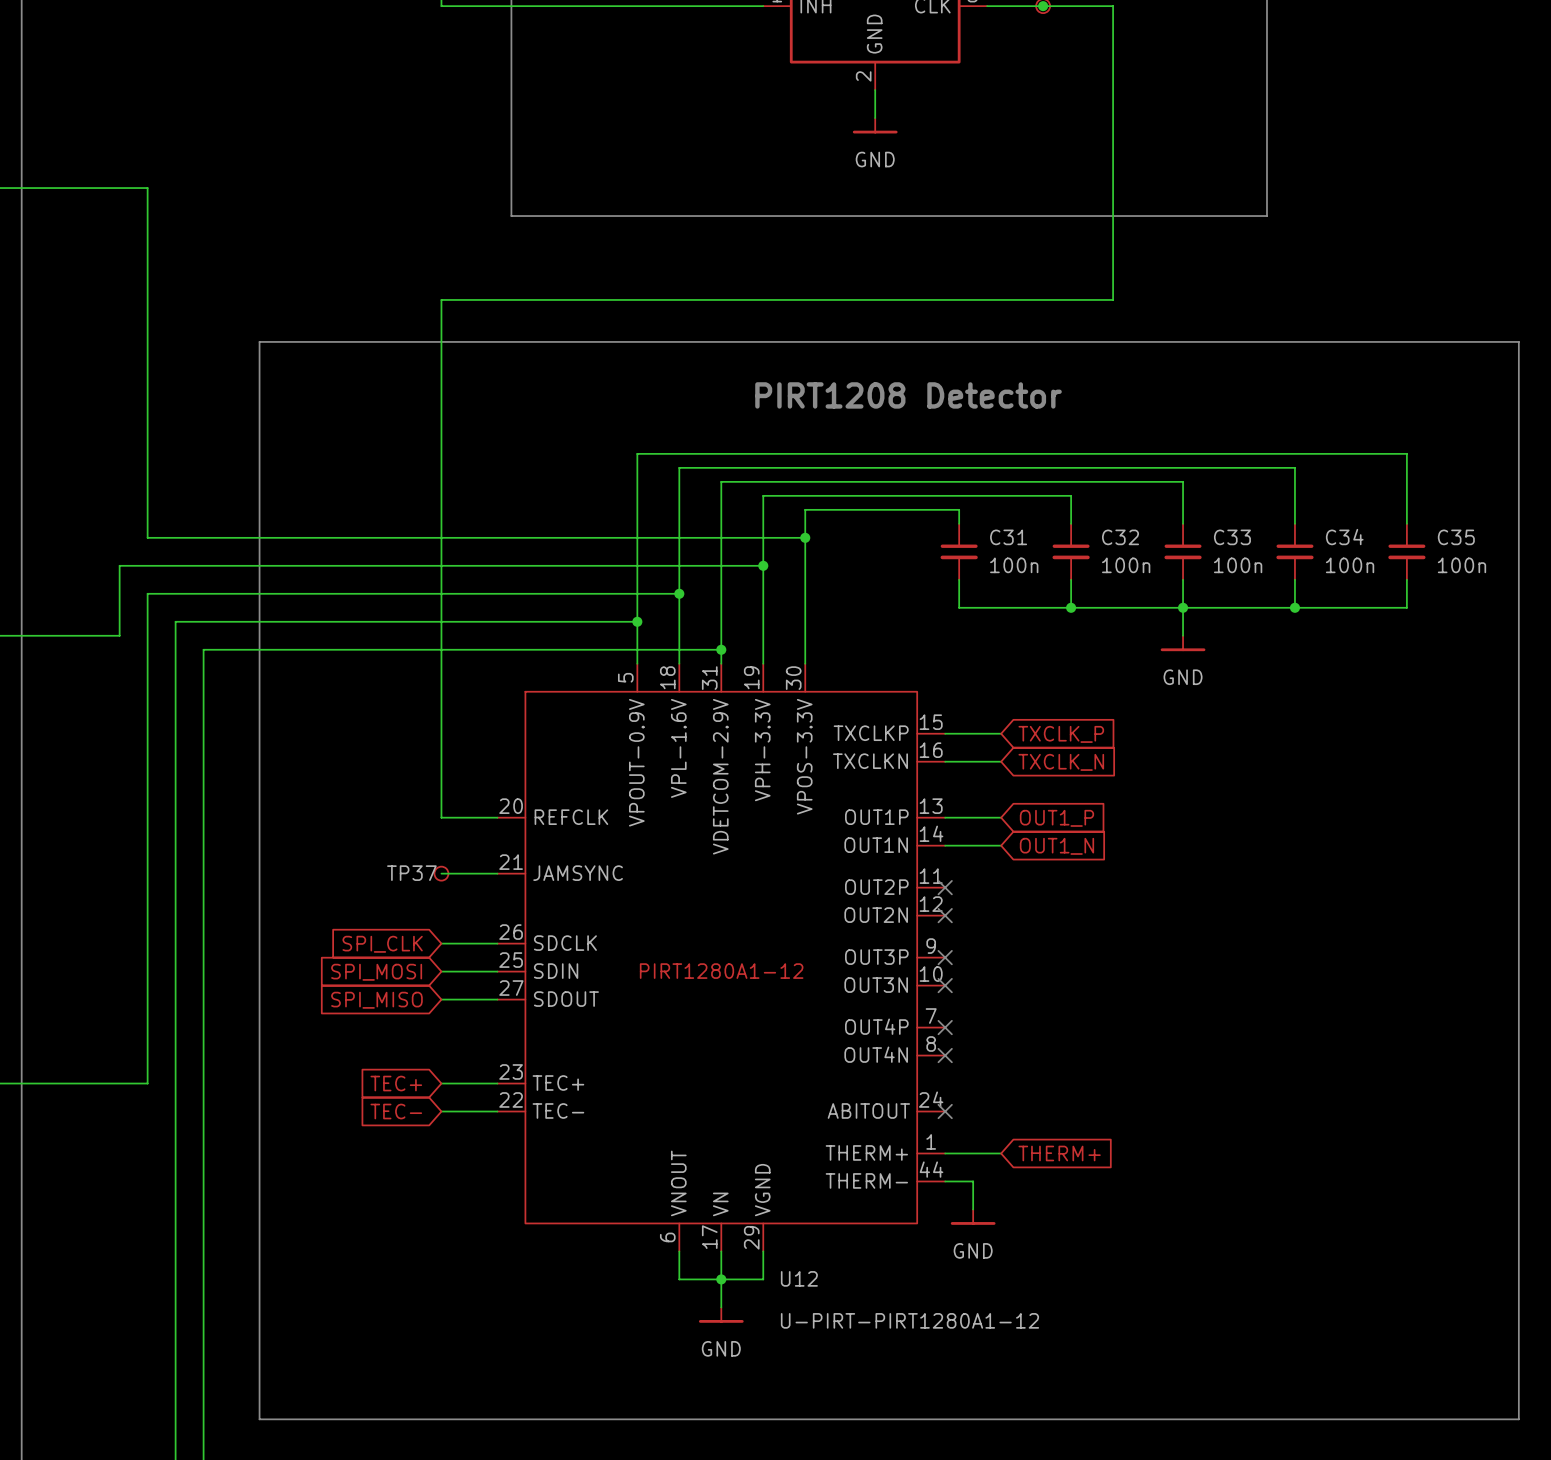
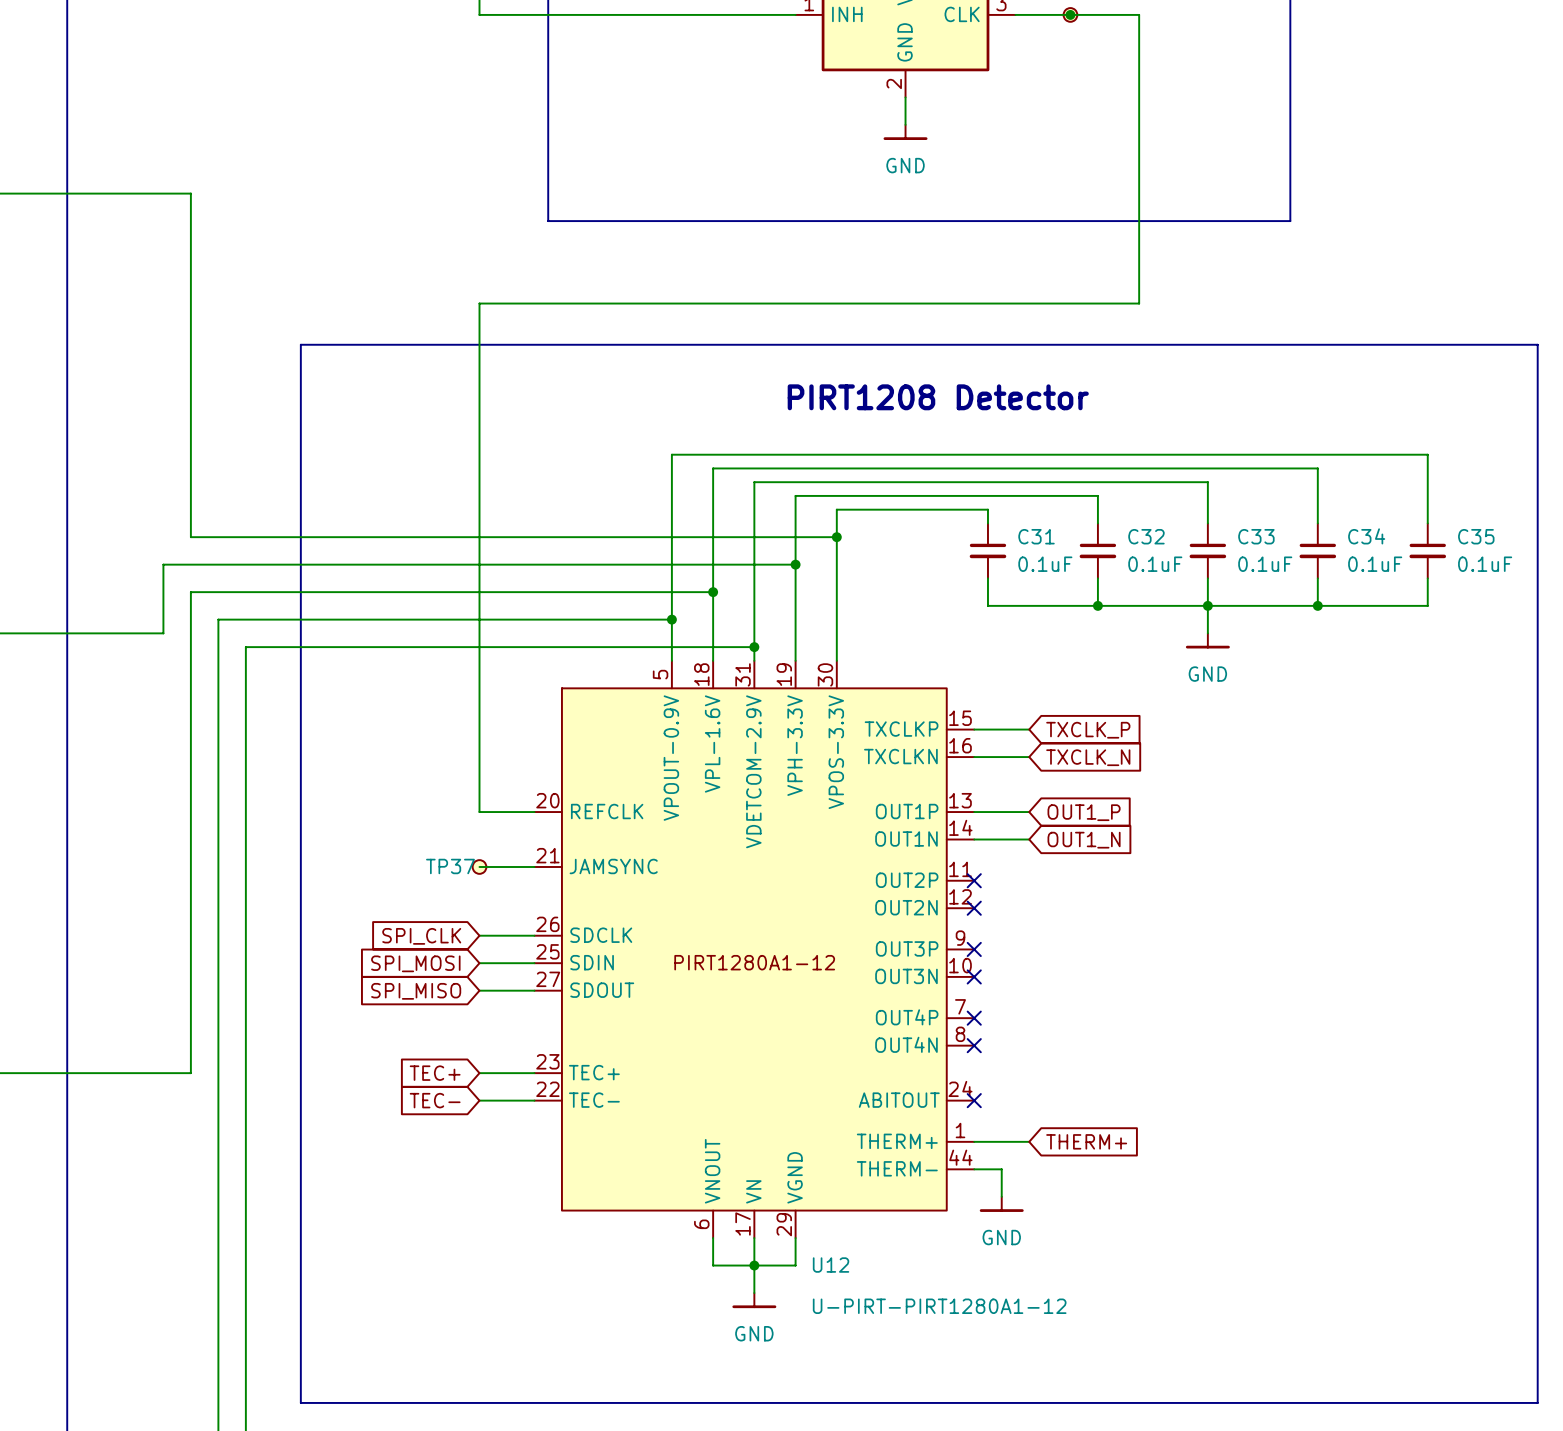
C31 value: 100n (1014, 565) -> 0.1uF (1045, 564)
C32 value: 100n (1126, 565) -> 0.1uF (1155, 564)
C33 value: 100n (1238, 565) -> 0.1uF (1265, 564)
C34 value: 100n (1350, 565) -> 0.1uF (1375, 564)
C35 value: 100n (1461, 565) -> 0.1uF (1485, 564)

